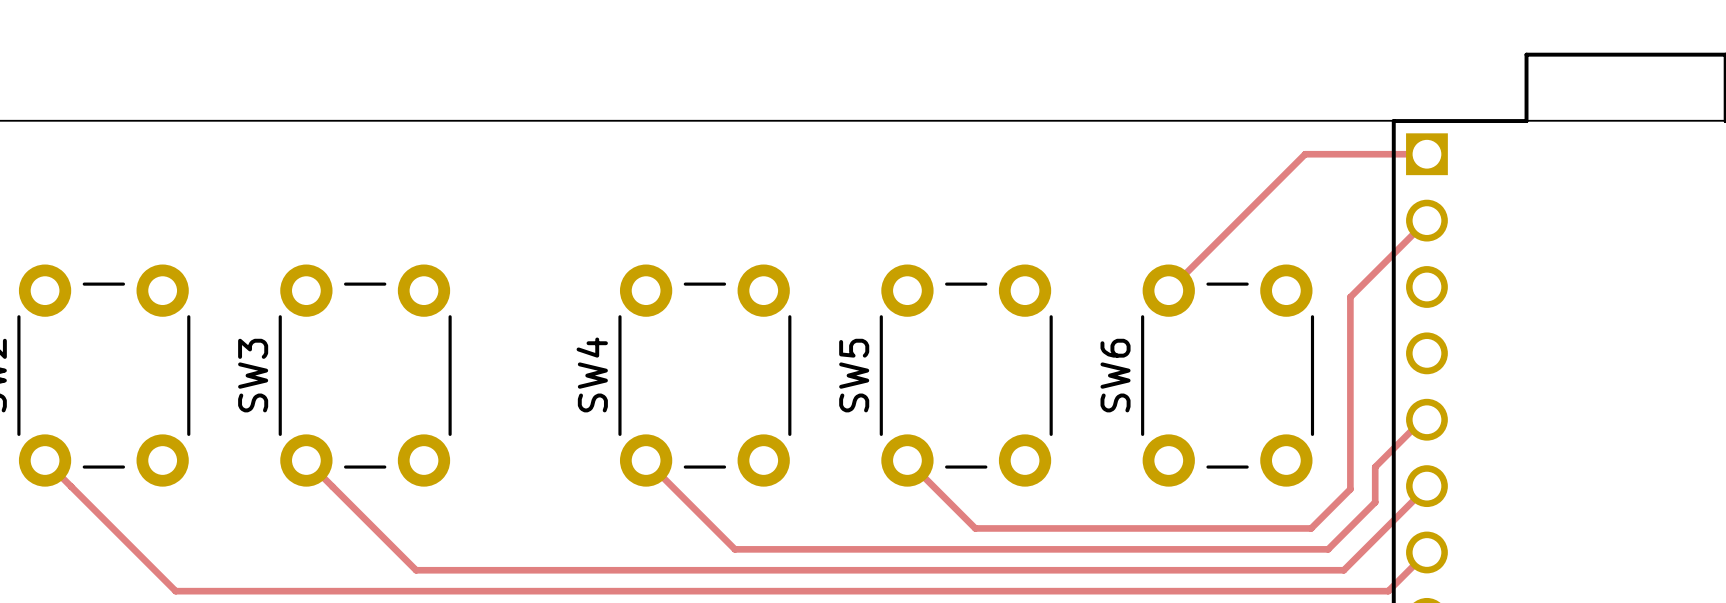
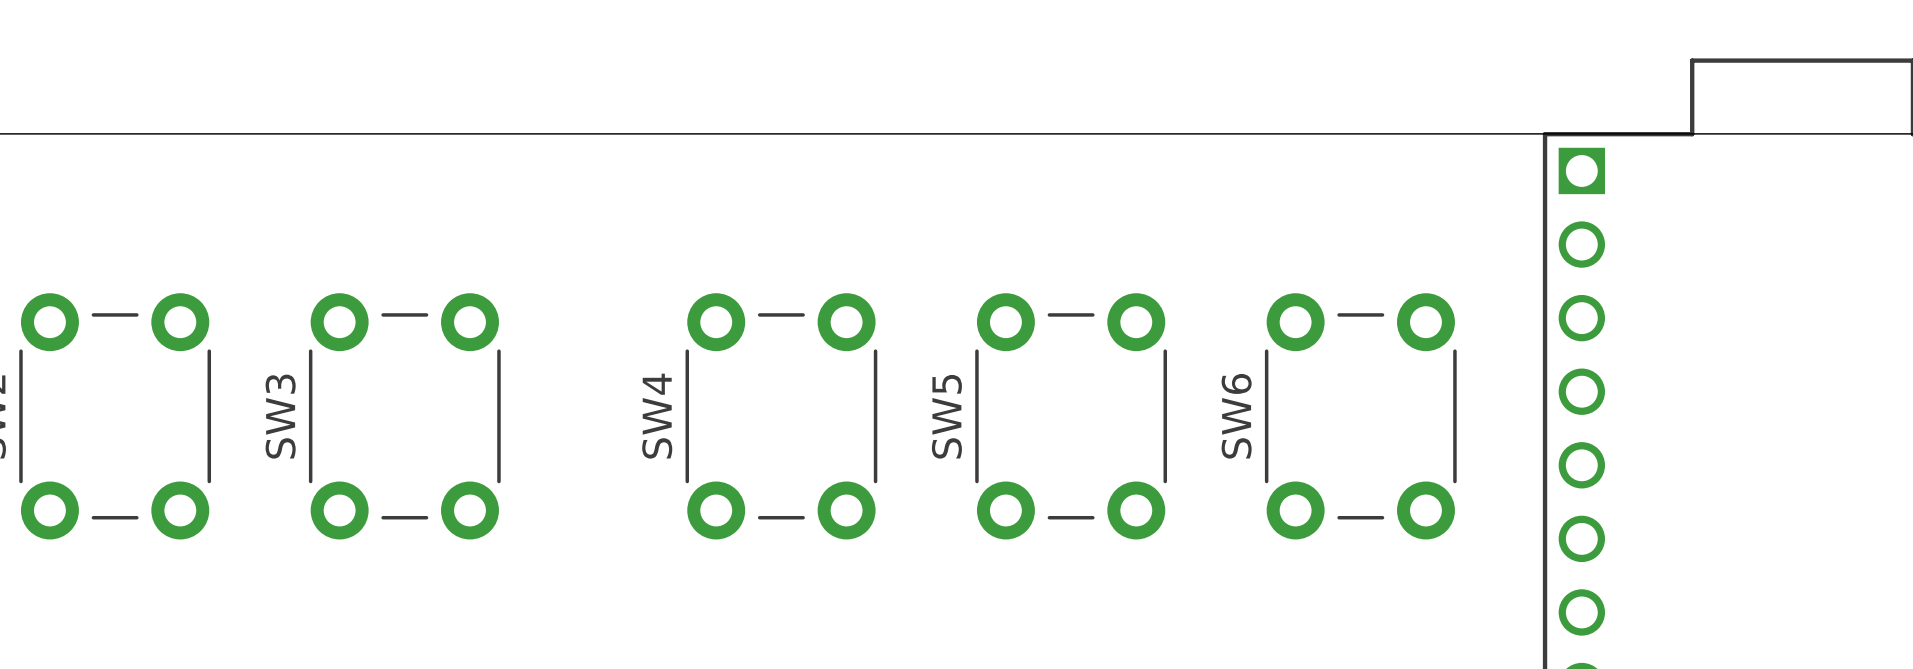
track: (1426, 154) (1305, 154) (1168, 290) -> none
track: (1426, 220) (1350, 297) (1350, 489) (1311, 528) (975, 528) (907, 460) -> none
track: (1426, 419) (1422, 419) (1375, 467) (1375, 502) (1328, 549) (734, 549) (646, 460) -> none
track: (45, 460) (175, 591) (1388, 591) (1426, 552) -> none
track: (306, 460) (416, 570) (1343, 570) (1426, 486) -> none

